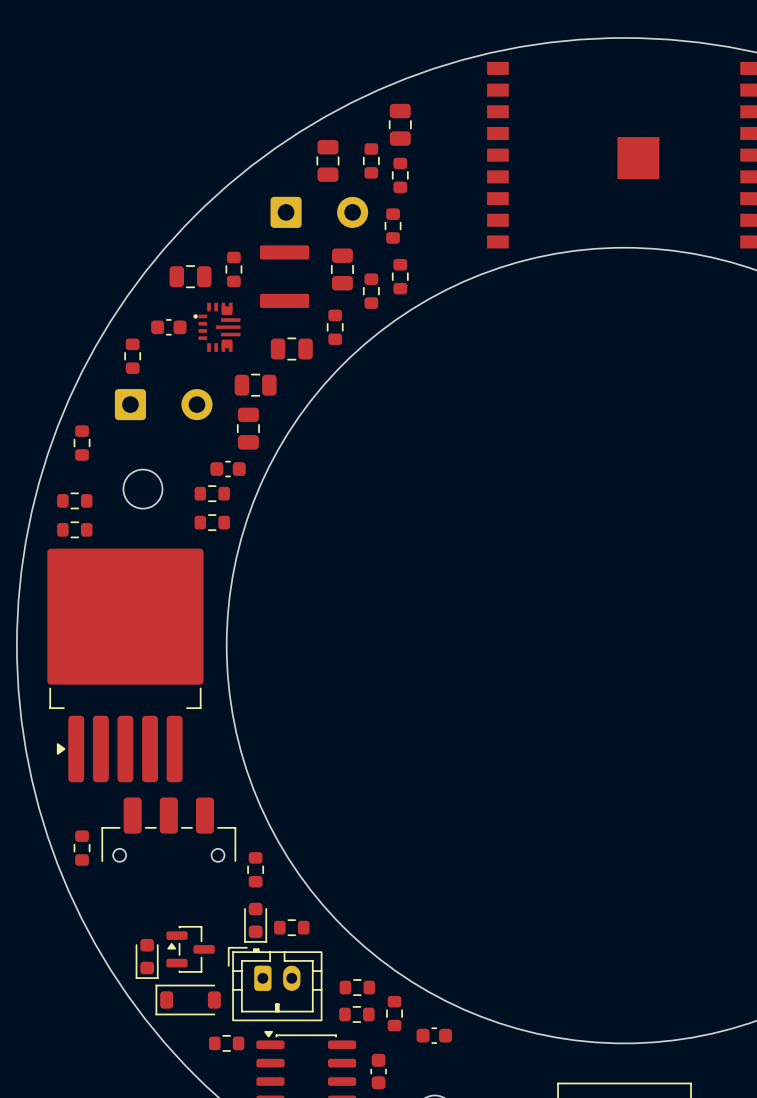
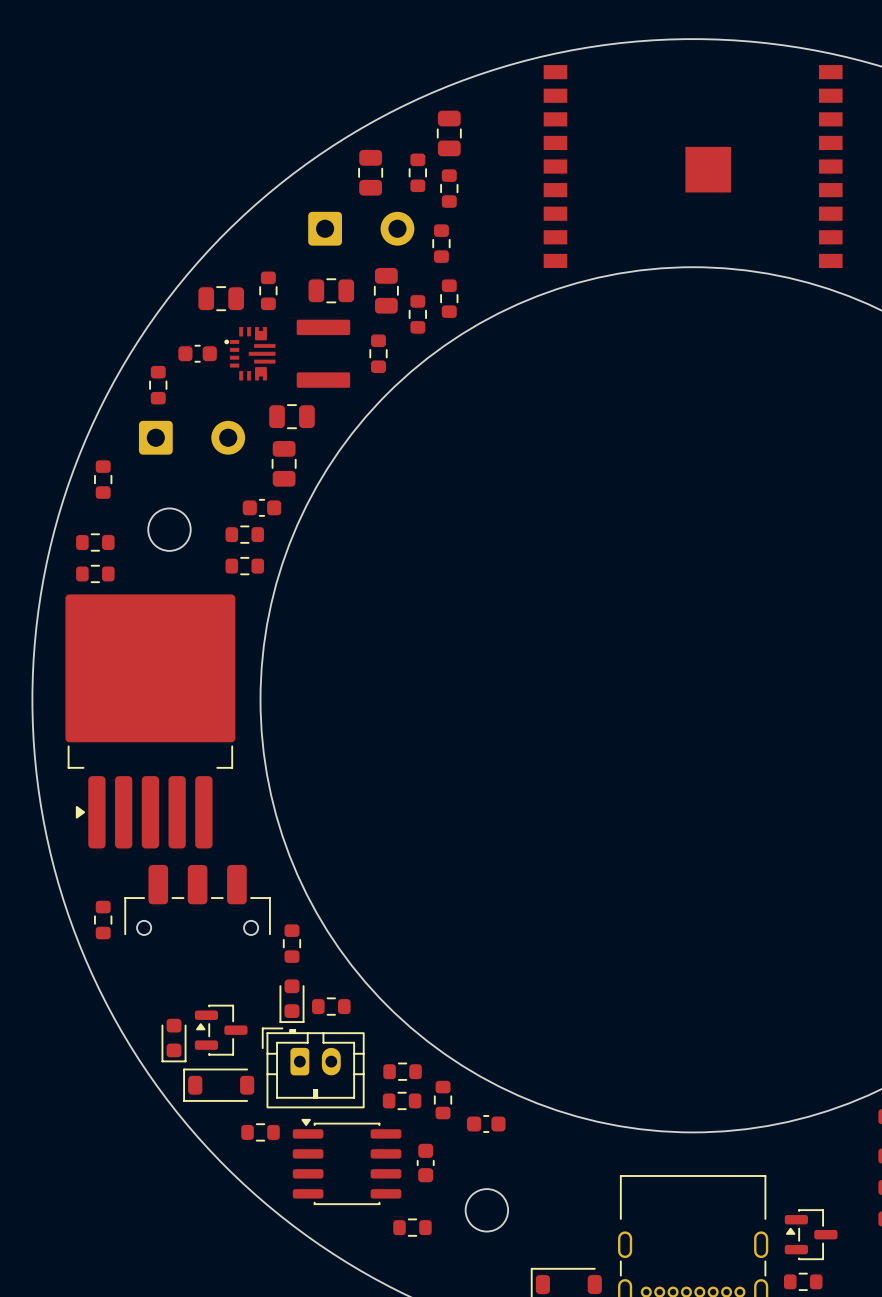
part footprint: [259, 245, 310, 309] -> [308, 278, 355, 304]
part: none -> (323, 353)
part: (291, 349) -> none

